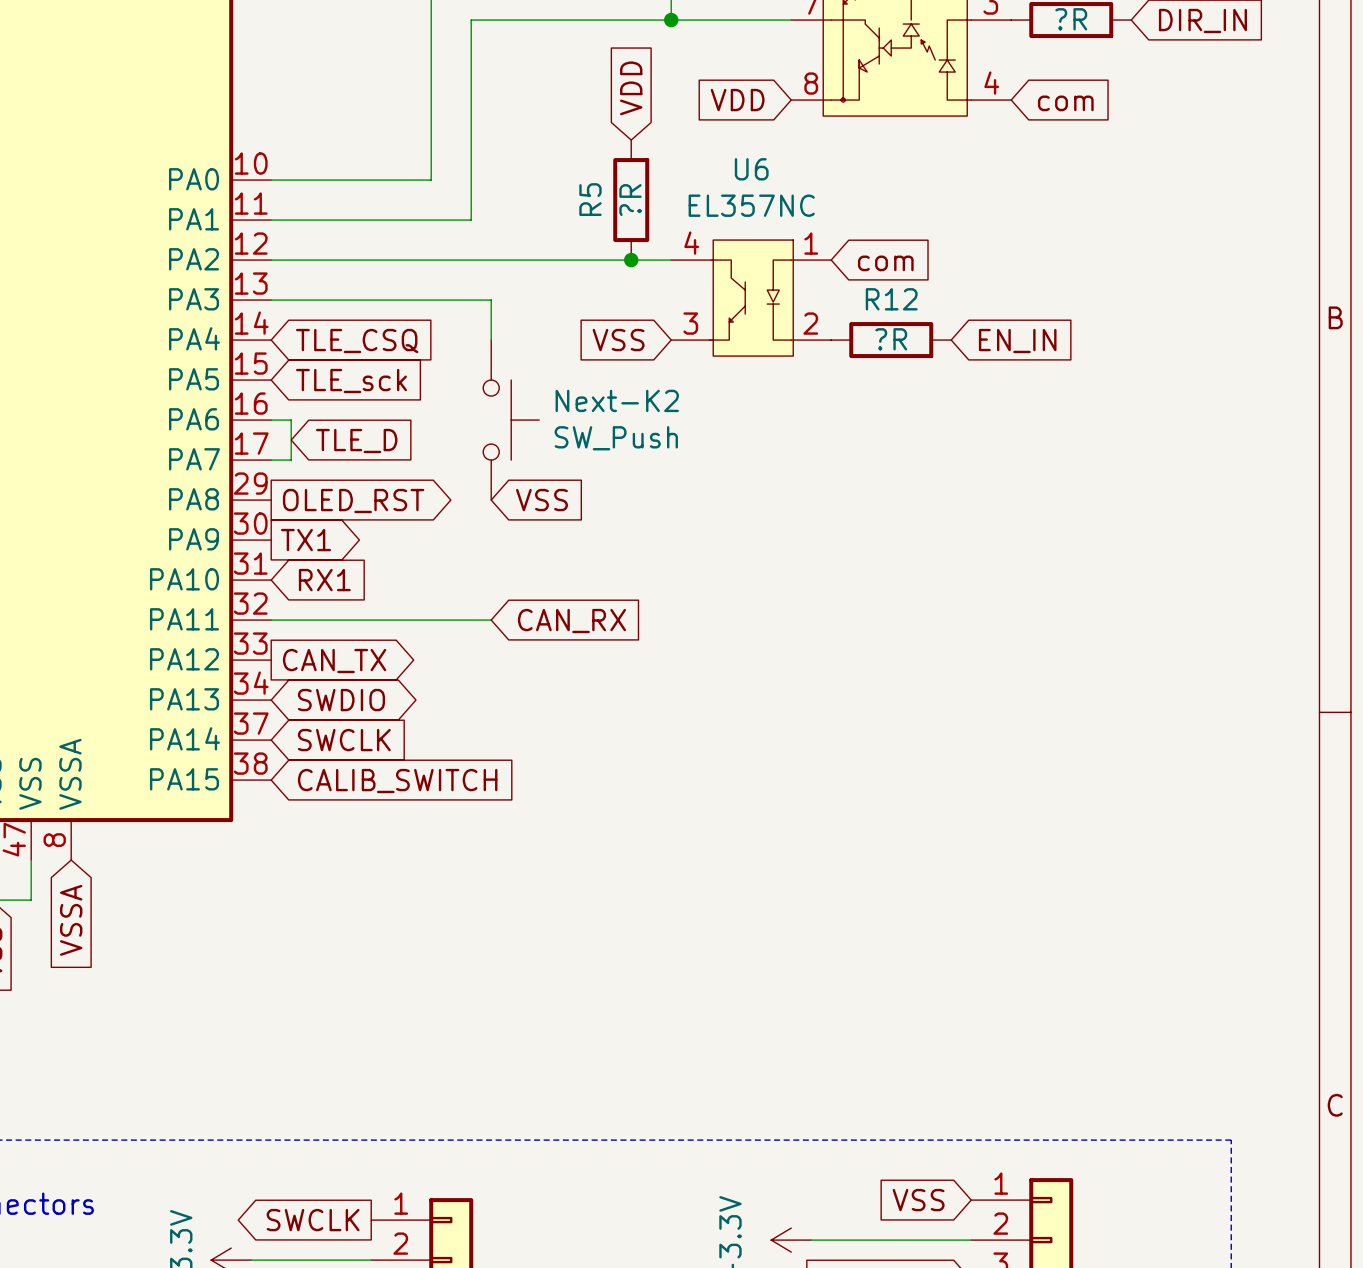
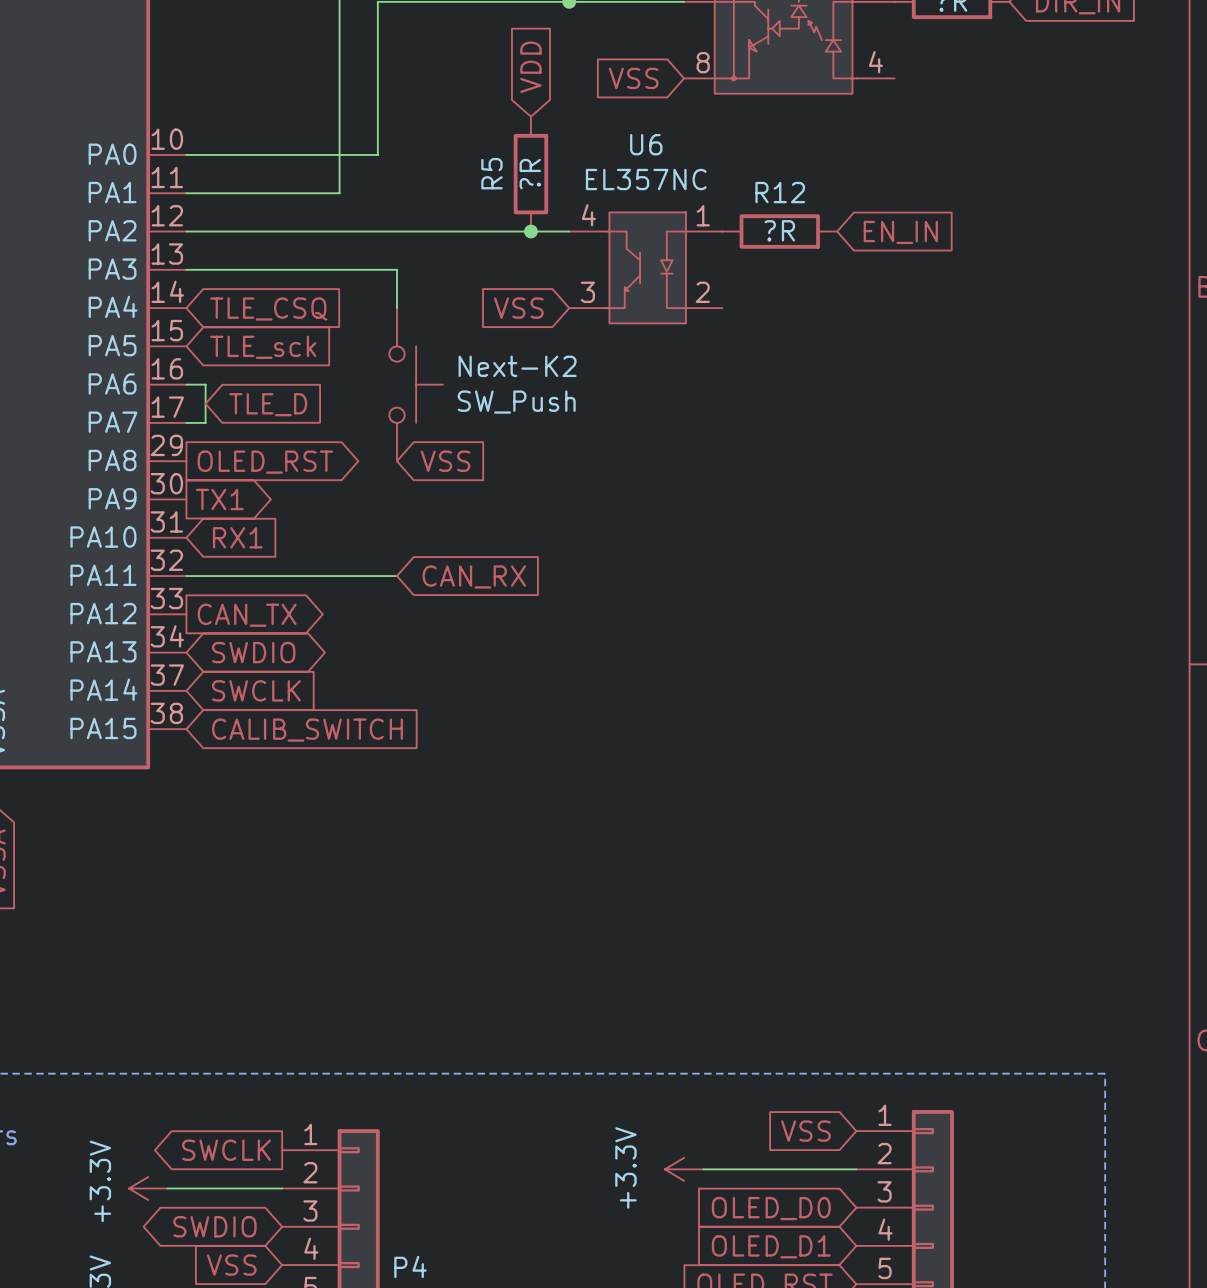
global label: VDD (737, 100) -> VSS (633, 78)
global label: com (1065, 103) -> none
wire: (471, 180) (471, 220) (431, 220) -> (377, 154) (339, 154) (339, 193)
global label: com (885, 263) -> none
R12 position: (891, 340) -> (779, 231)
global label position: EN_IN (1017, 341) -> EN_IN (900, 232)

